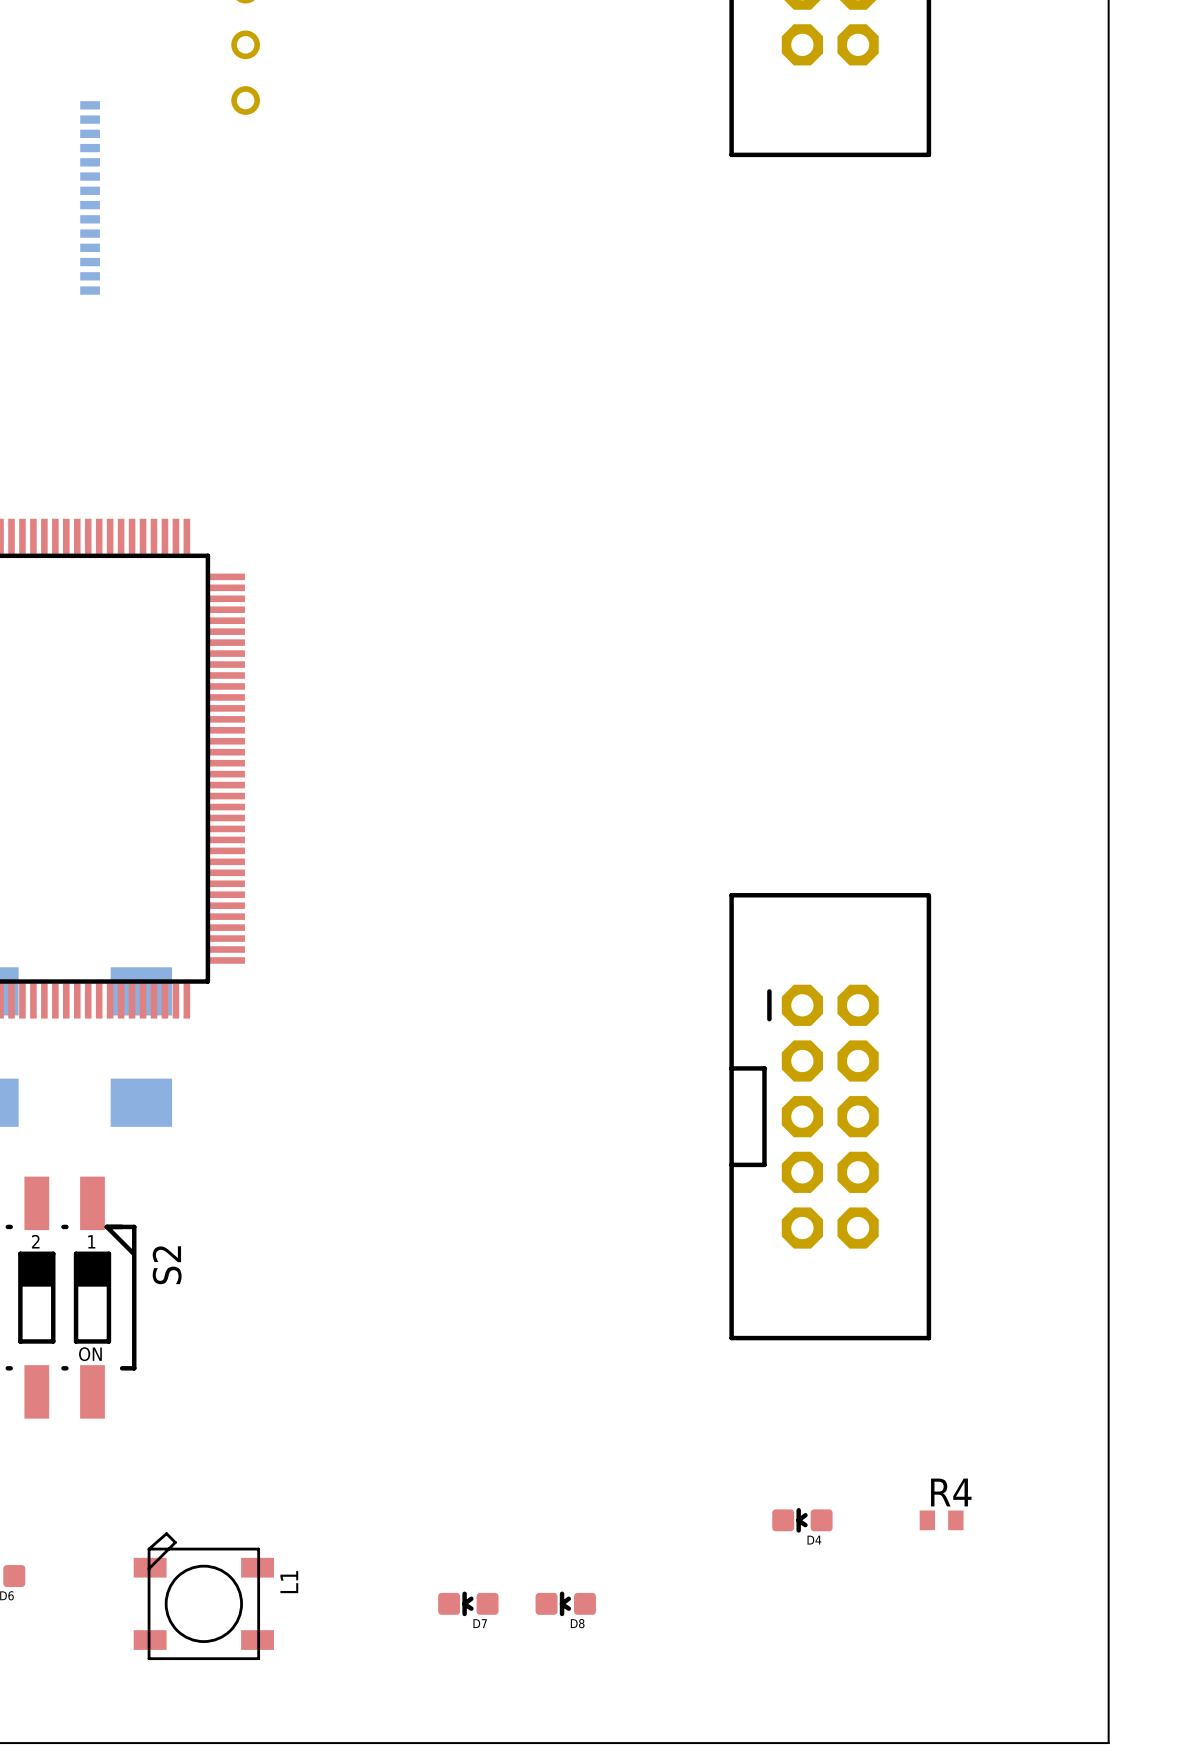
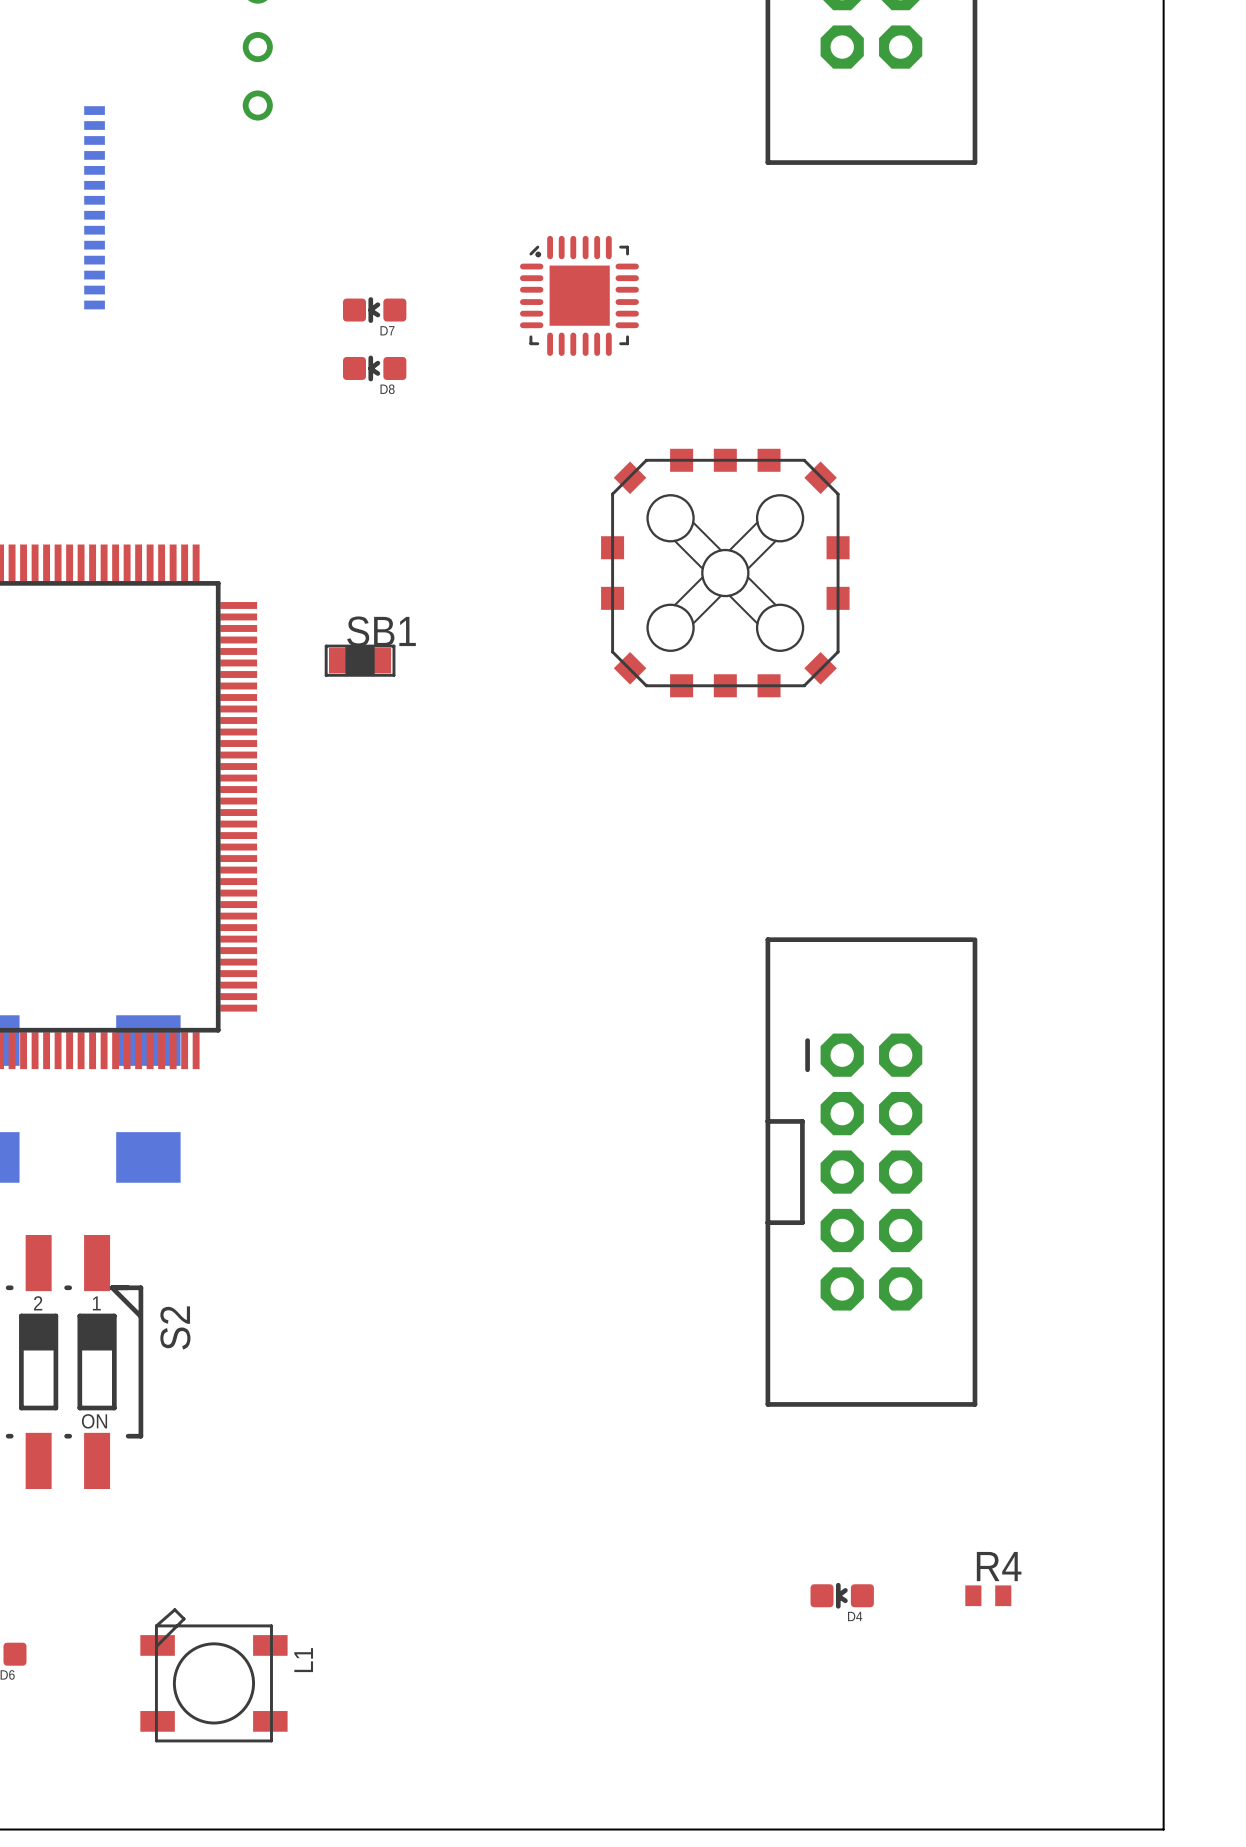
part: none -> (579, 295)
part: none -> (725, 573)
SB1: none -> (360, 660)
D7 position: (468, 1603) -> (374, 310)
D8 position: (565, 1603) -> (374, 368)

